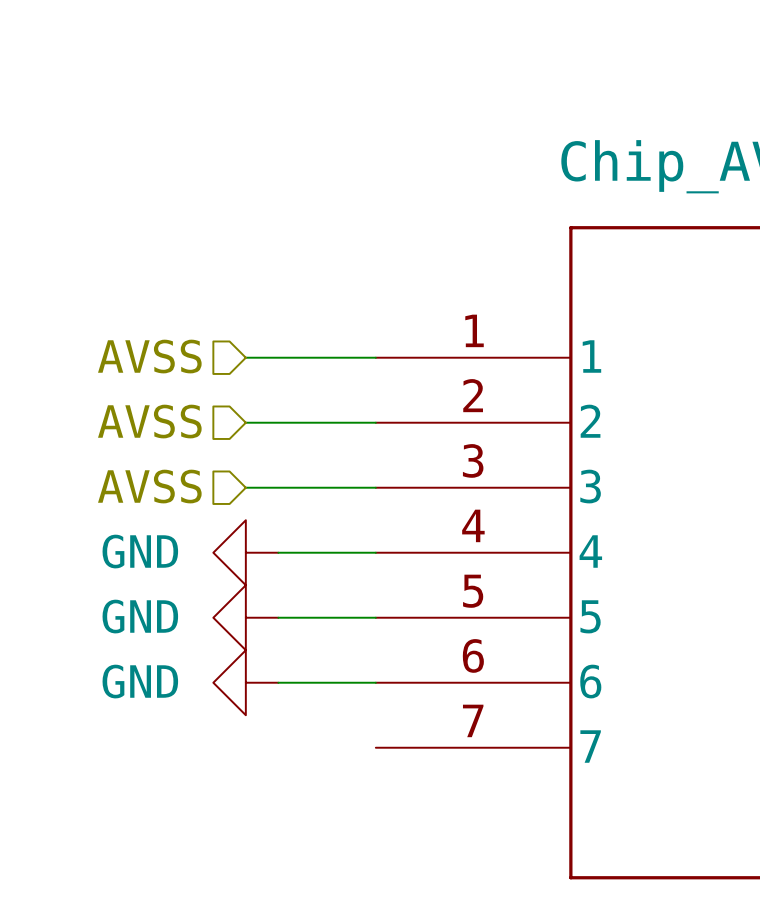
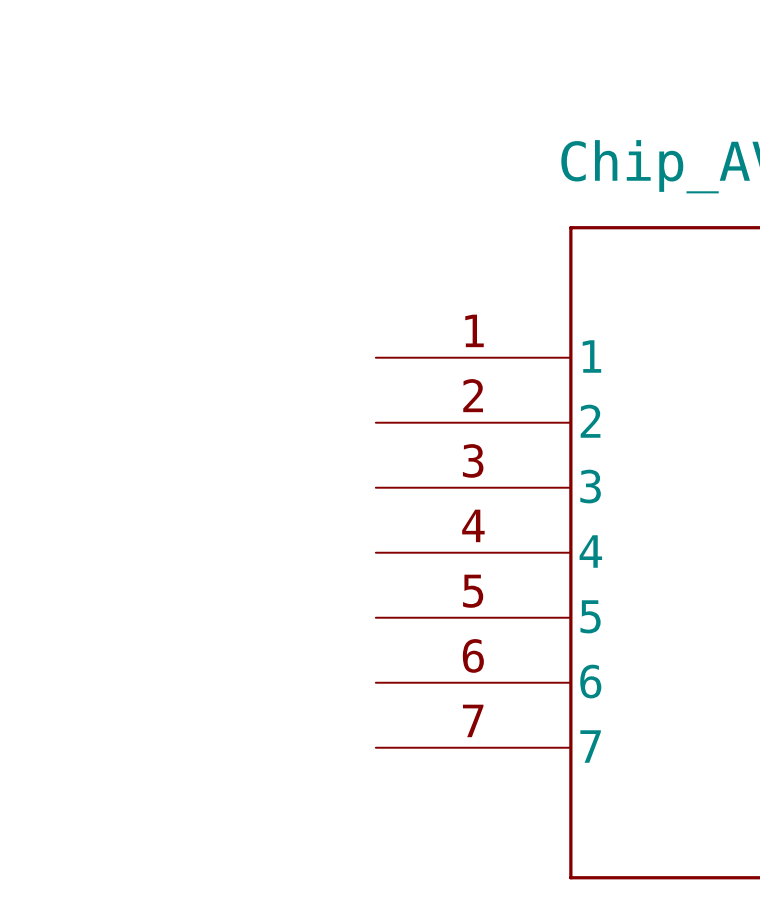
hierarchical label: AVSS (149, 356) -> none
wire: (245, 357) (375, 357) -> none
hierarchical label: AVSS (149, 421) -> none
wire: (245, 422) (375, 422) -> none
hierarchical label: AVSS (149, 486) -> none
wire: (245, 487) (375, 487) -> none
power symbol: GND (245, 552) -> none
wire: (278, 552) (375, 552) -> none
power symbol: GND (245, 617) -> none
wire: (278, 617) (375, 617) -> none
power symbol: GND (245, 682) -> none
wire: (278, 682) (375, 682) -> none

